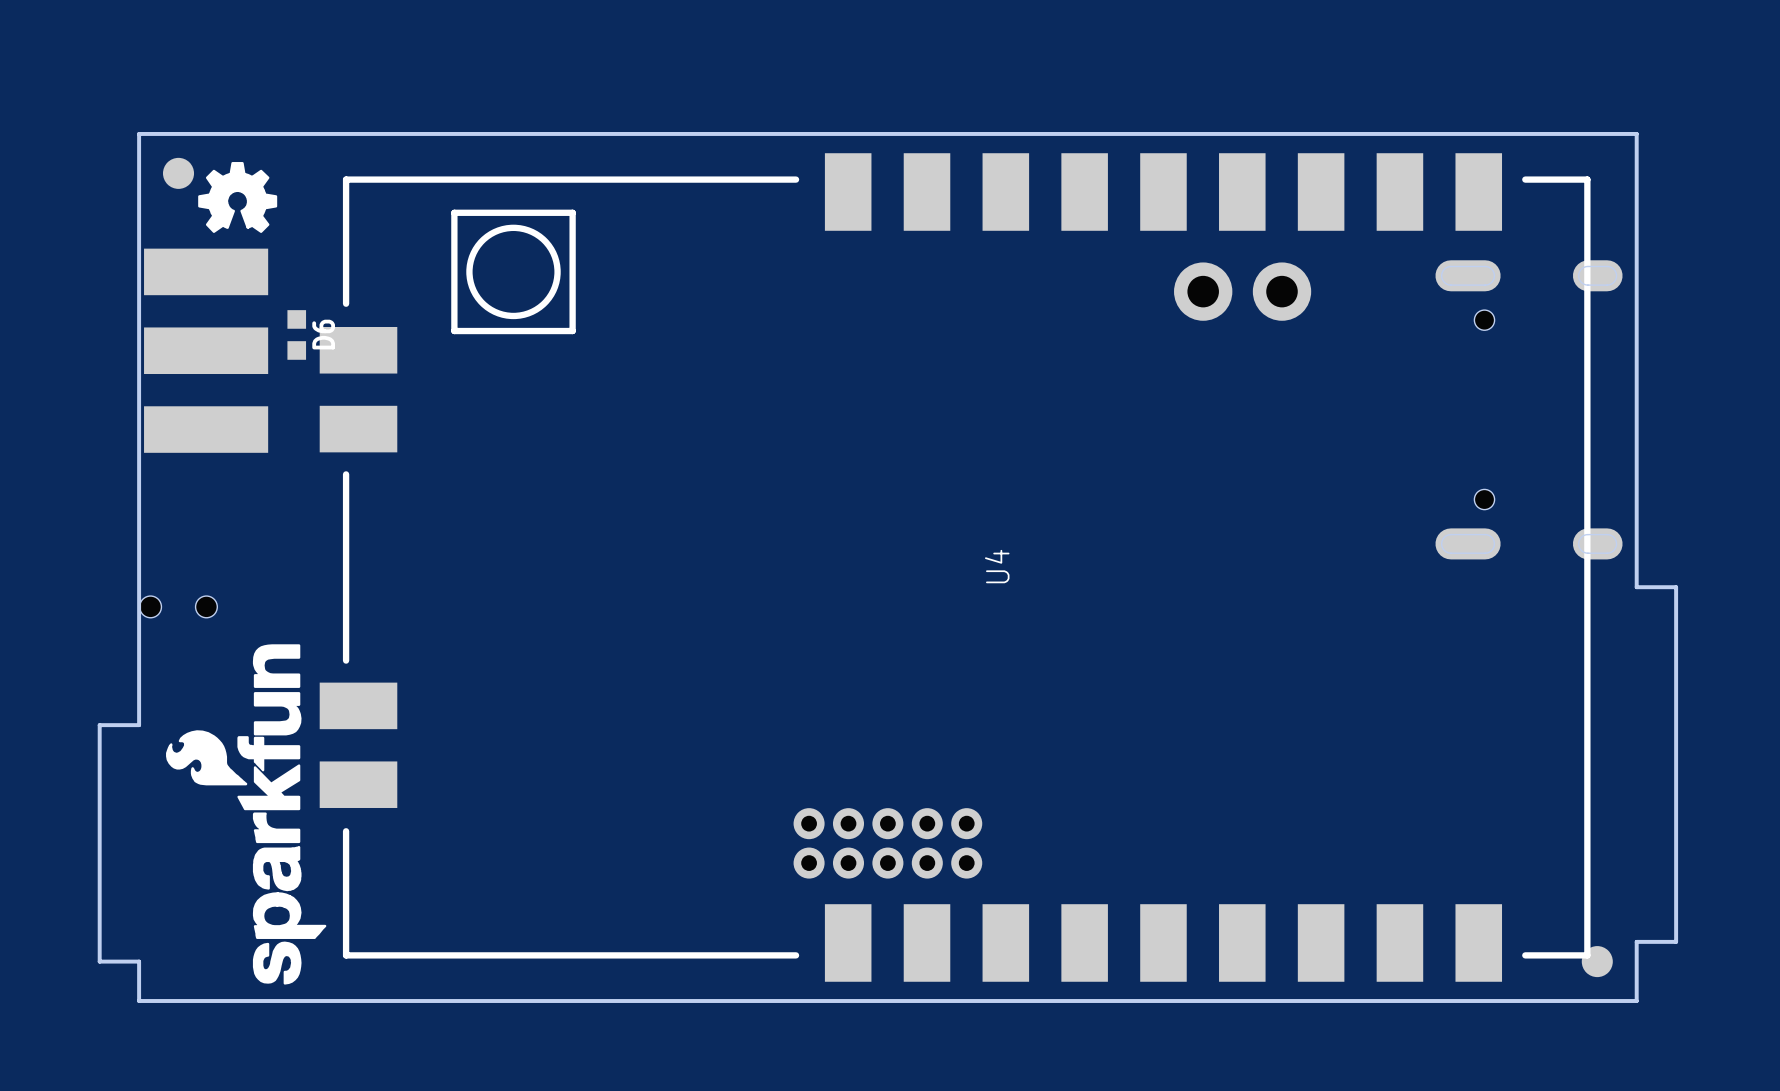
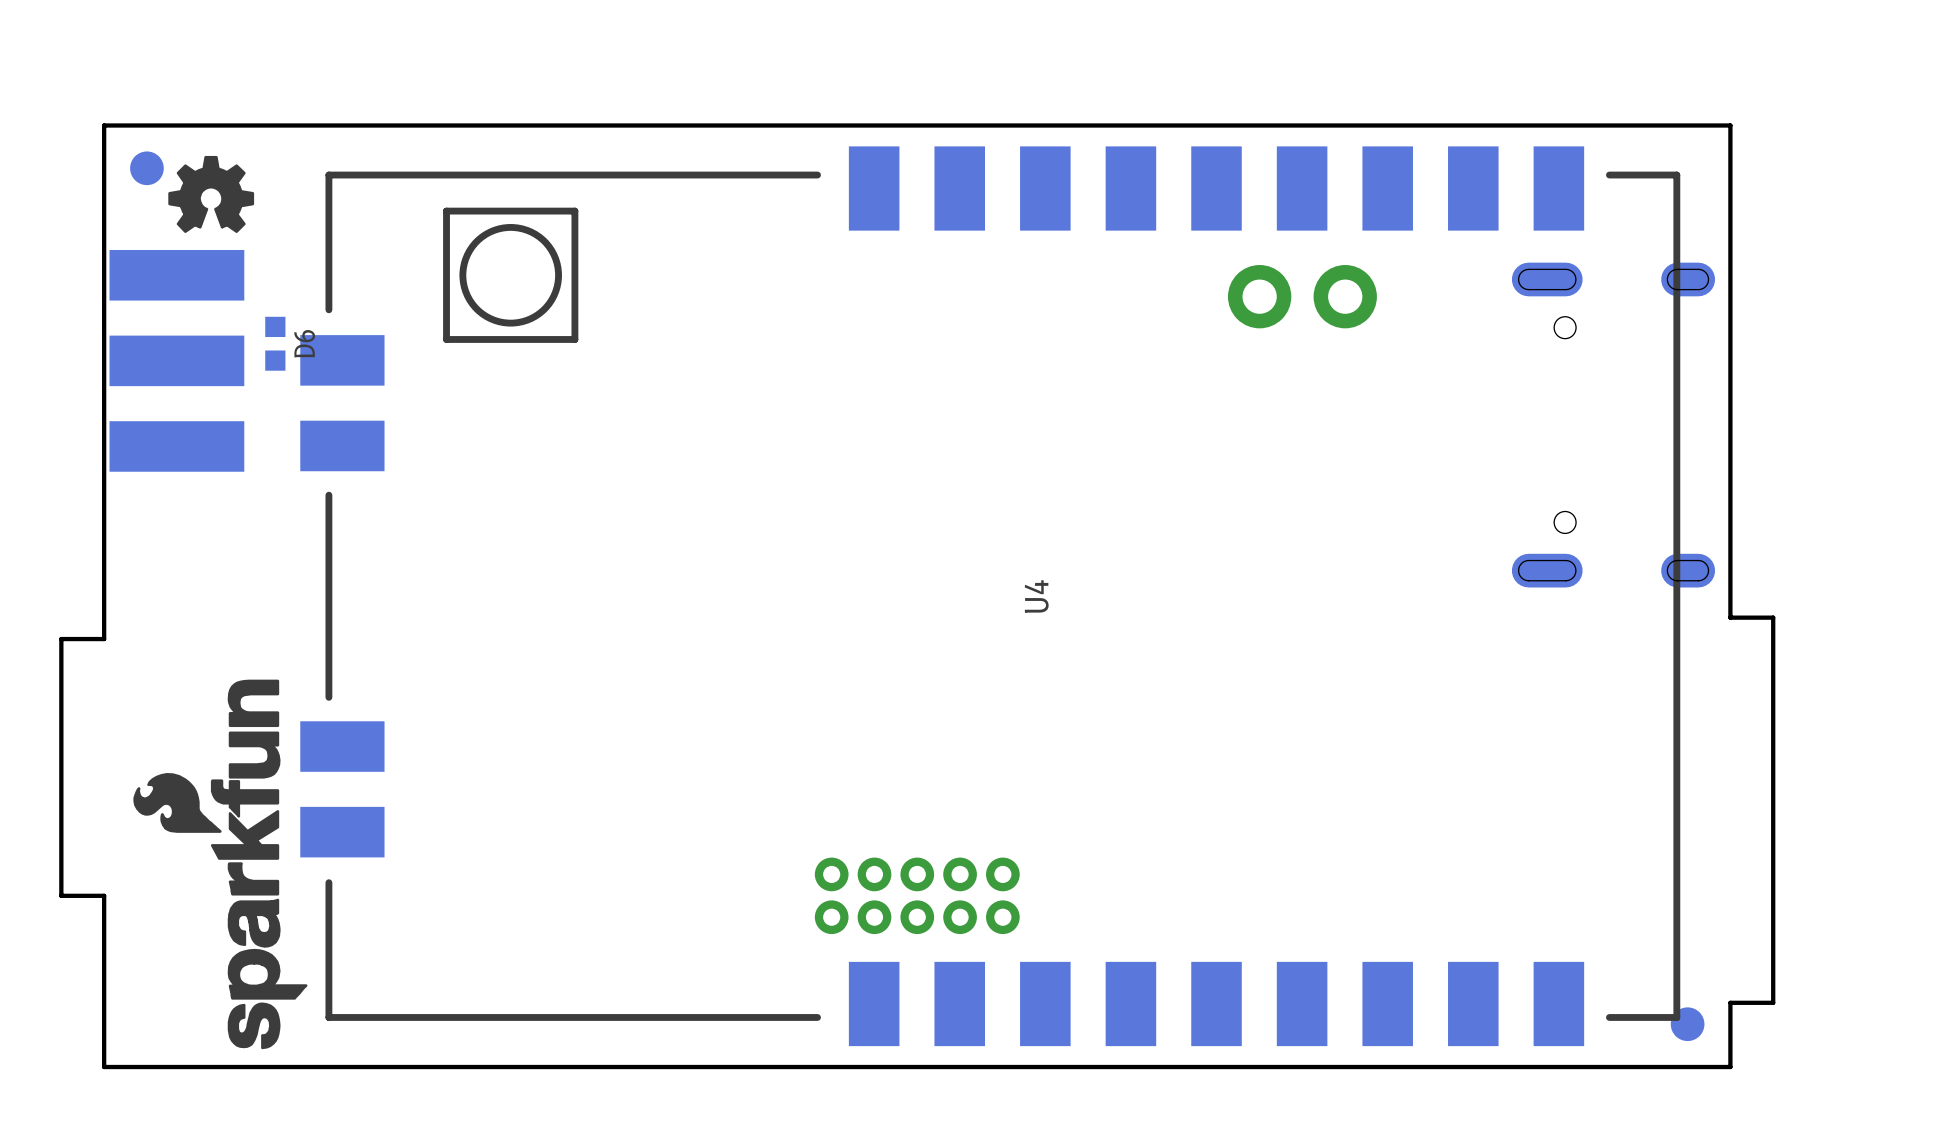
board edge: (139, 606) (139, 725) (99, 725) -> (104, 639) (61, 639) (61, 767)
part: (178, 606) -> none
board edge: (99, 843) (99, 961) (139, 961) -> (61, 895) (104, 895) (104, 1024)

